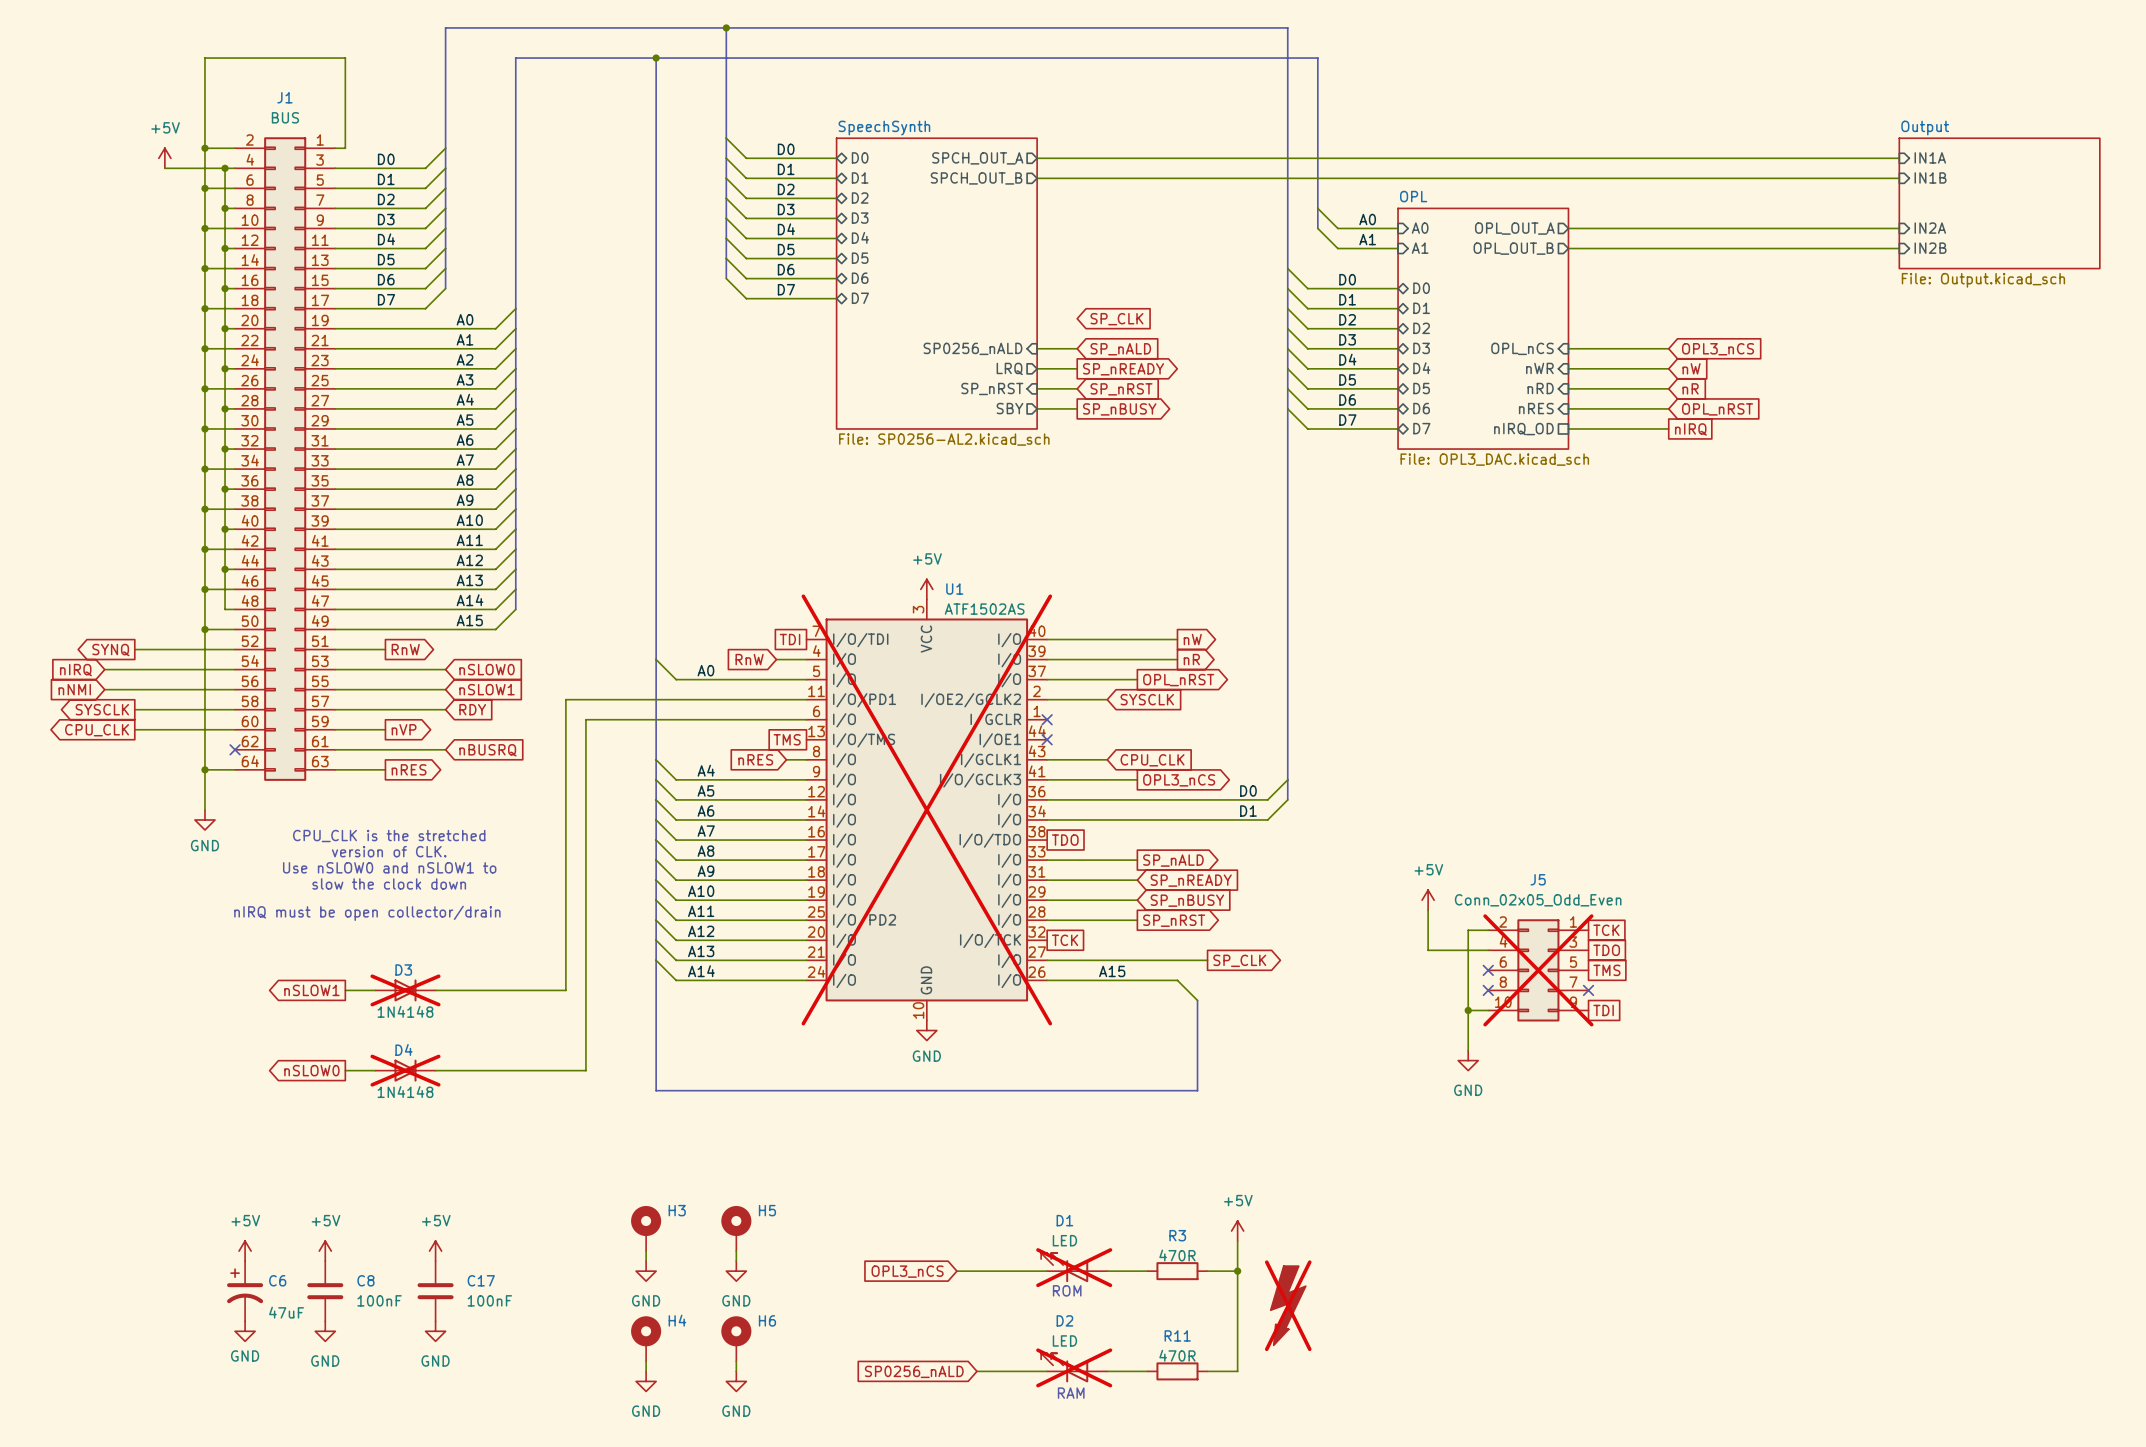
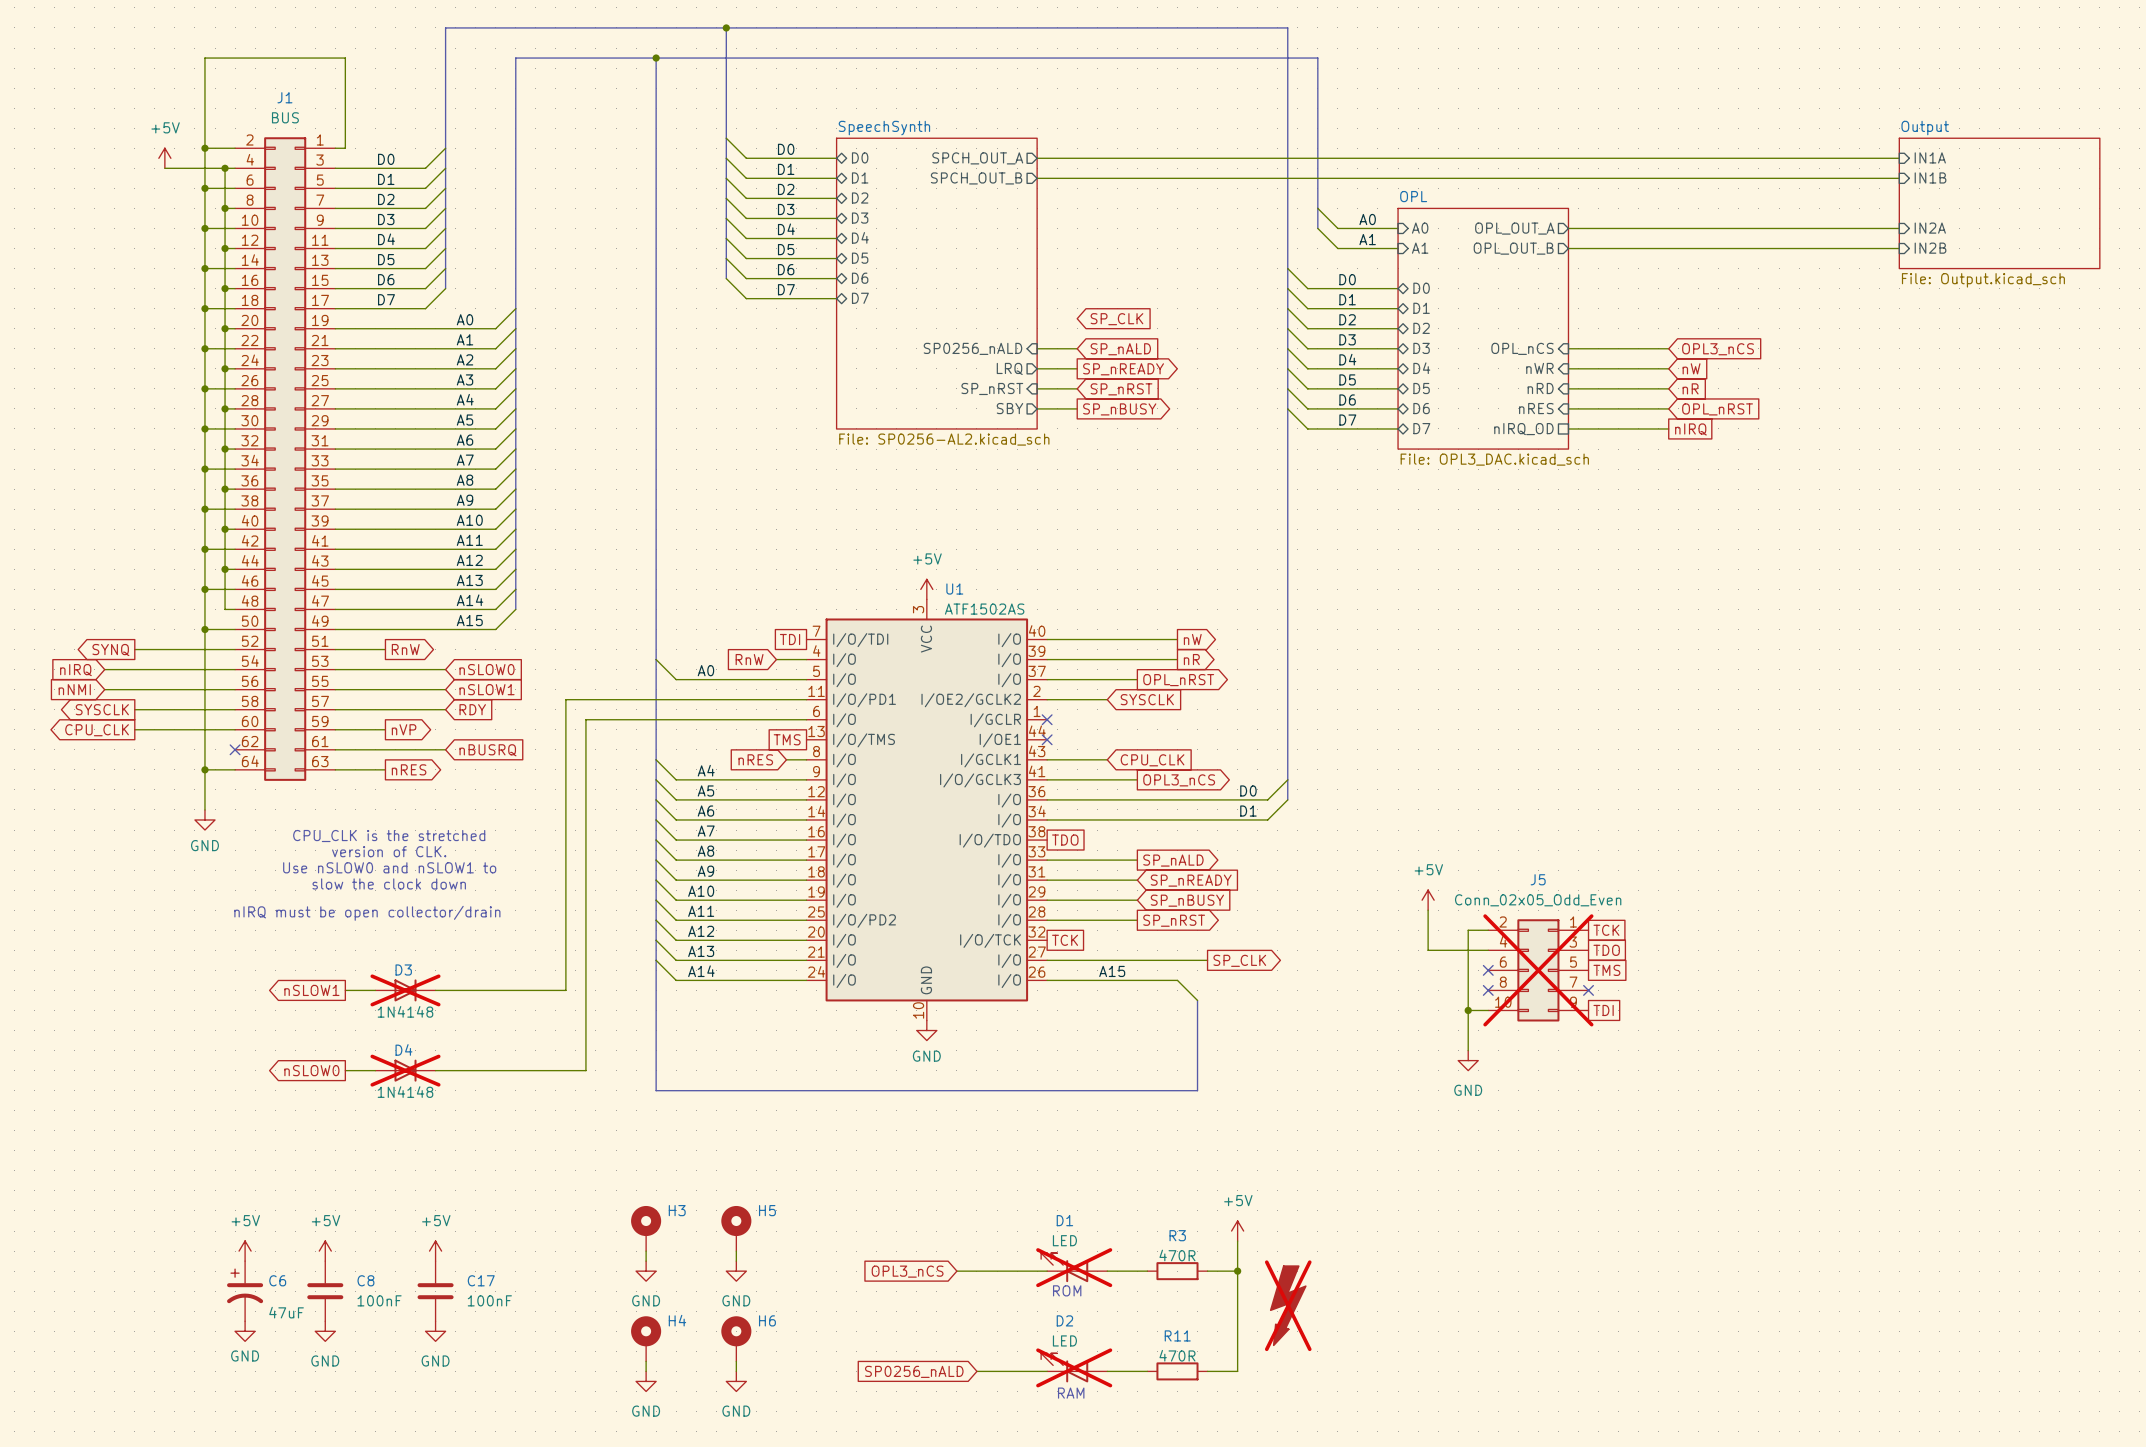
U1 do-not-place cross: (926, 809) -> none

